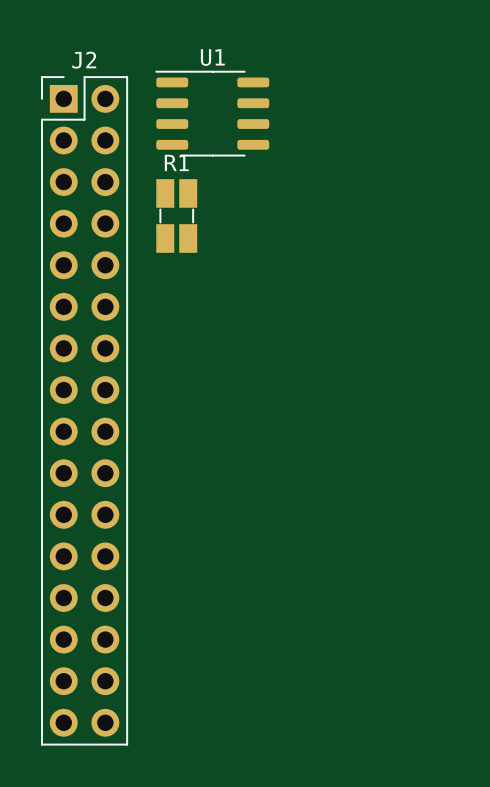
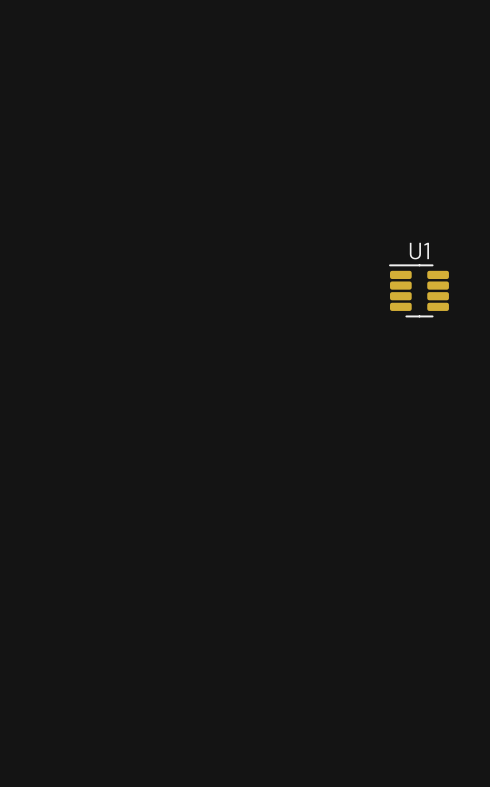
U1 footprint: [155, 70, 270, 157] -> [389, 264, 449, 318]
R1: (176, 215) -> none
J2: (84, 410) -> none

